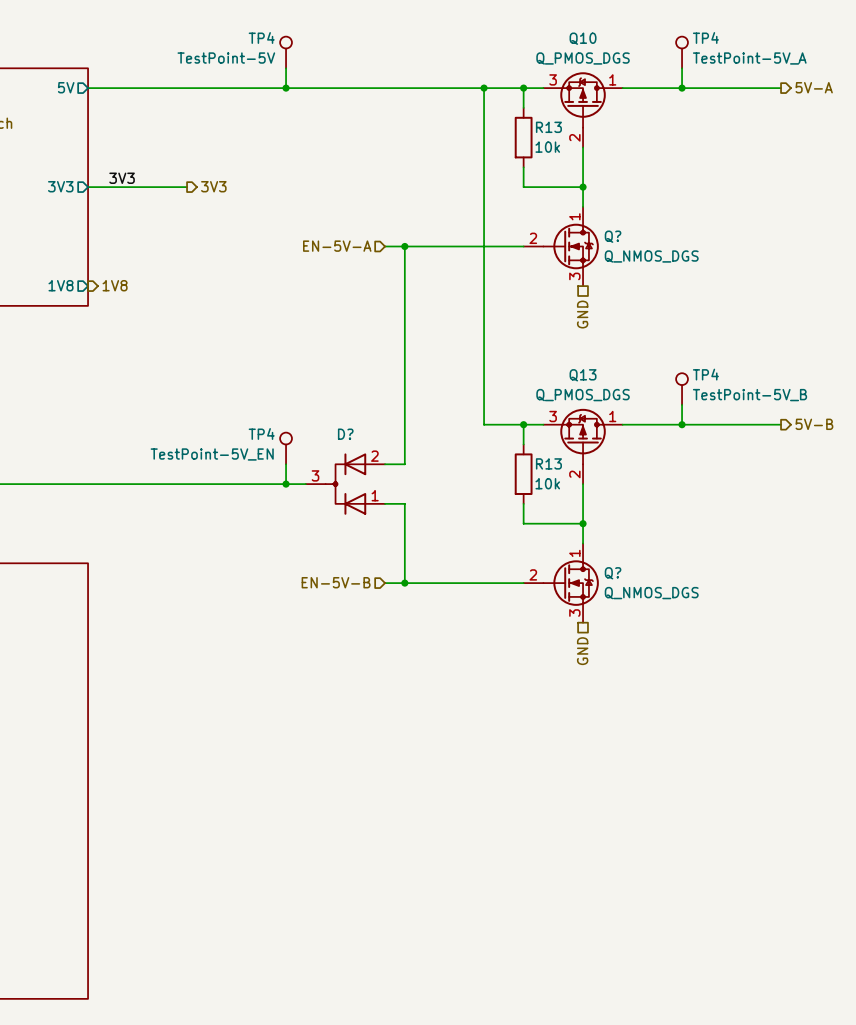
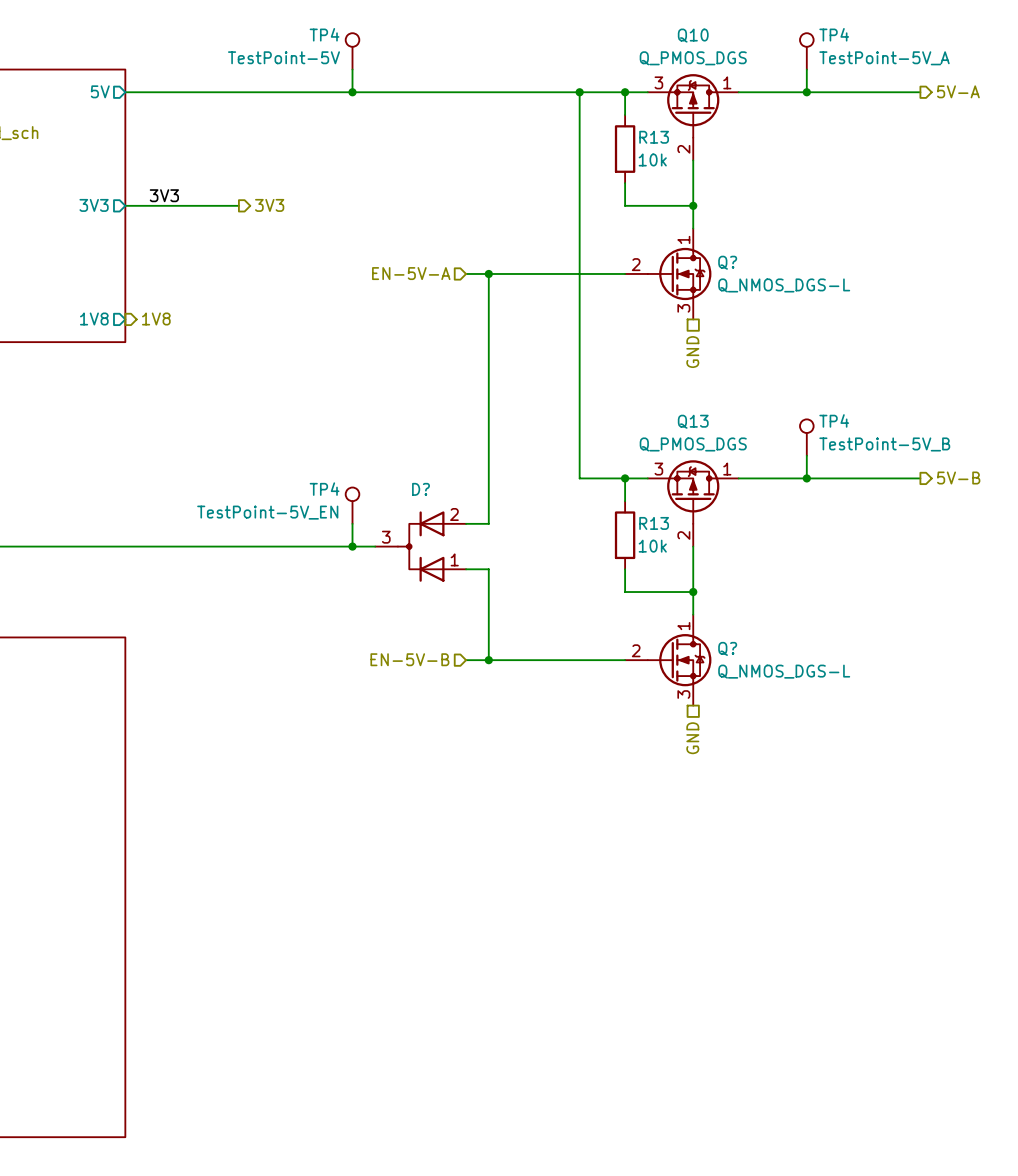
Q? value: Q_NMOS_DGS (651, 256) -> Q_NMOS_DGS-L (784, 285)
Q? value: Q_NMOS_DGS (651, 593) -> Q_NMOS_DGS-L (784, 671)

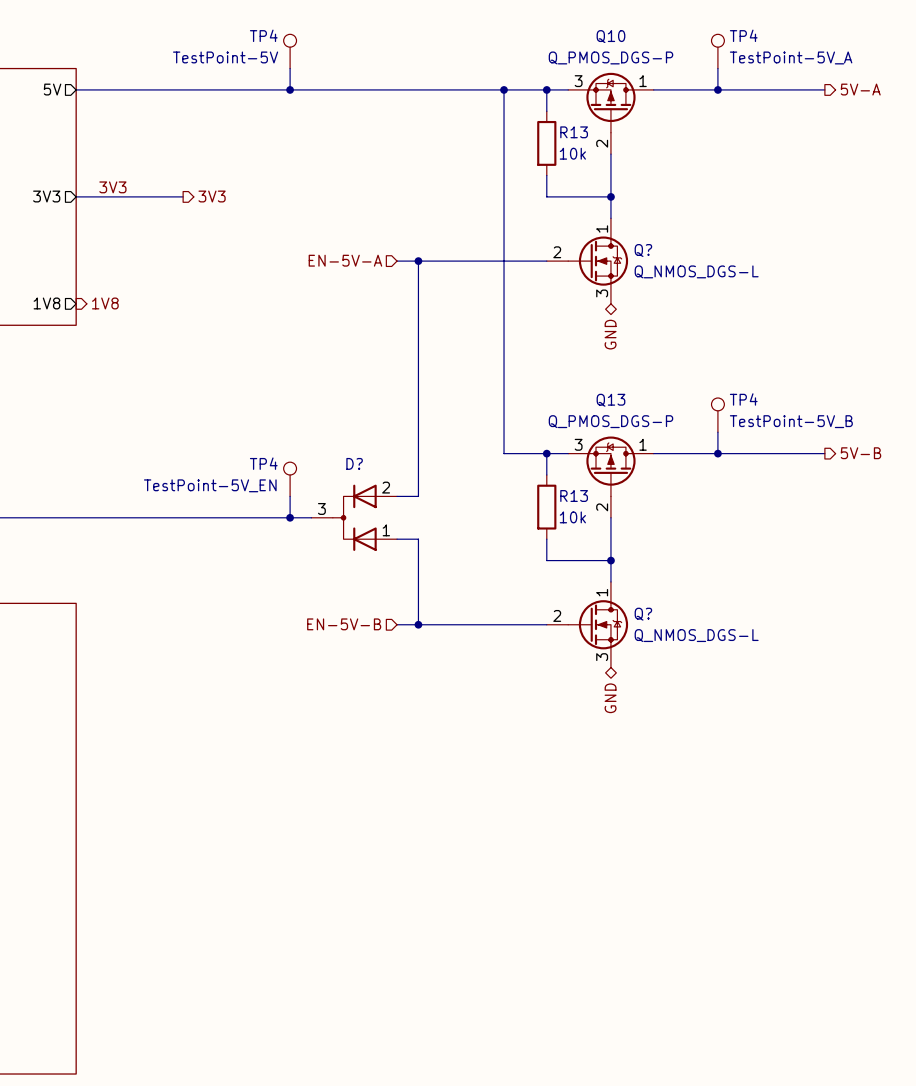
Q10 value: Q_PMOS_DGS (693, 58) -> Q_PMOS_DGS-P (610, 57)
hierarchical label shape: passive (692, 352) -> bidirectional (610, 334)
Q13 value: Q_PMOS_DGS (693, 444) -> Q_PMOS_DGS-P (610, 421)
hierarchical label shape: passive (692, 738) -> bidirectional (610, 698)

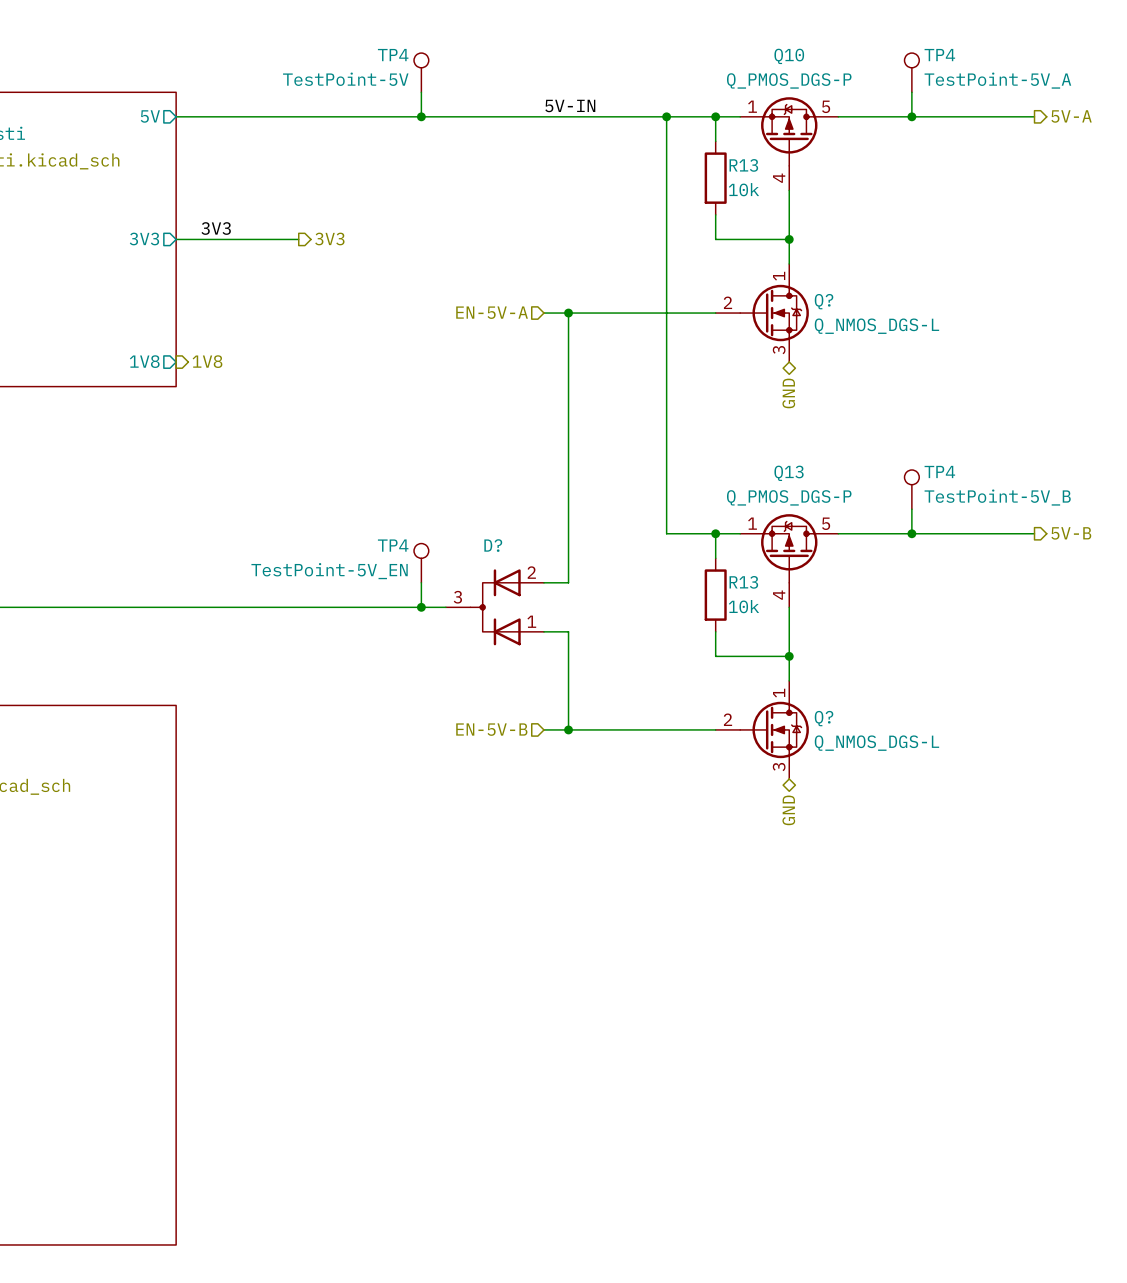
label: none -> 5V-IN (570, 105)
Q10 pin number: 3 (578, 81) -> 1 (752, 106)
Q10 pin number: 1 (643, 81) -> 5 (826, 106)
Q10 pin number: 2 (602, 143) -> 4 (779, 178)
Q13 pin number: 3 (578, 444) -> 1 (752, 523)
Q13 pin number: 1 (643, 444) -> 5 (826, 523)
Q13 pin number: 2 (602, 507) -> 4 (779, 595)

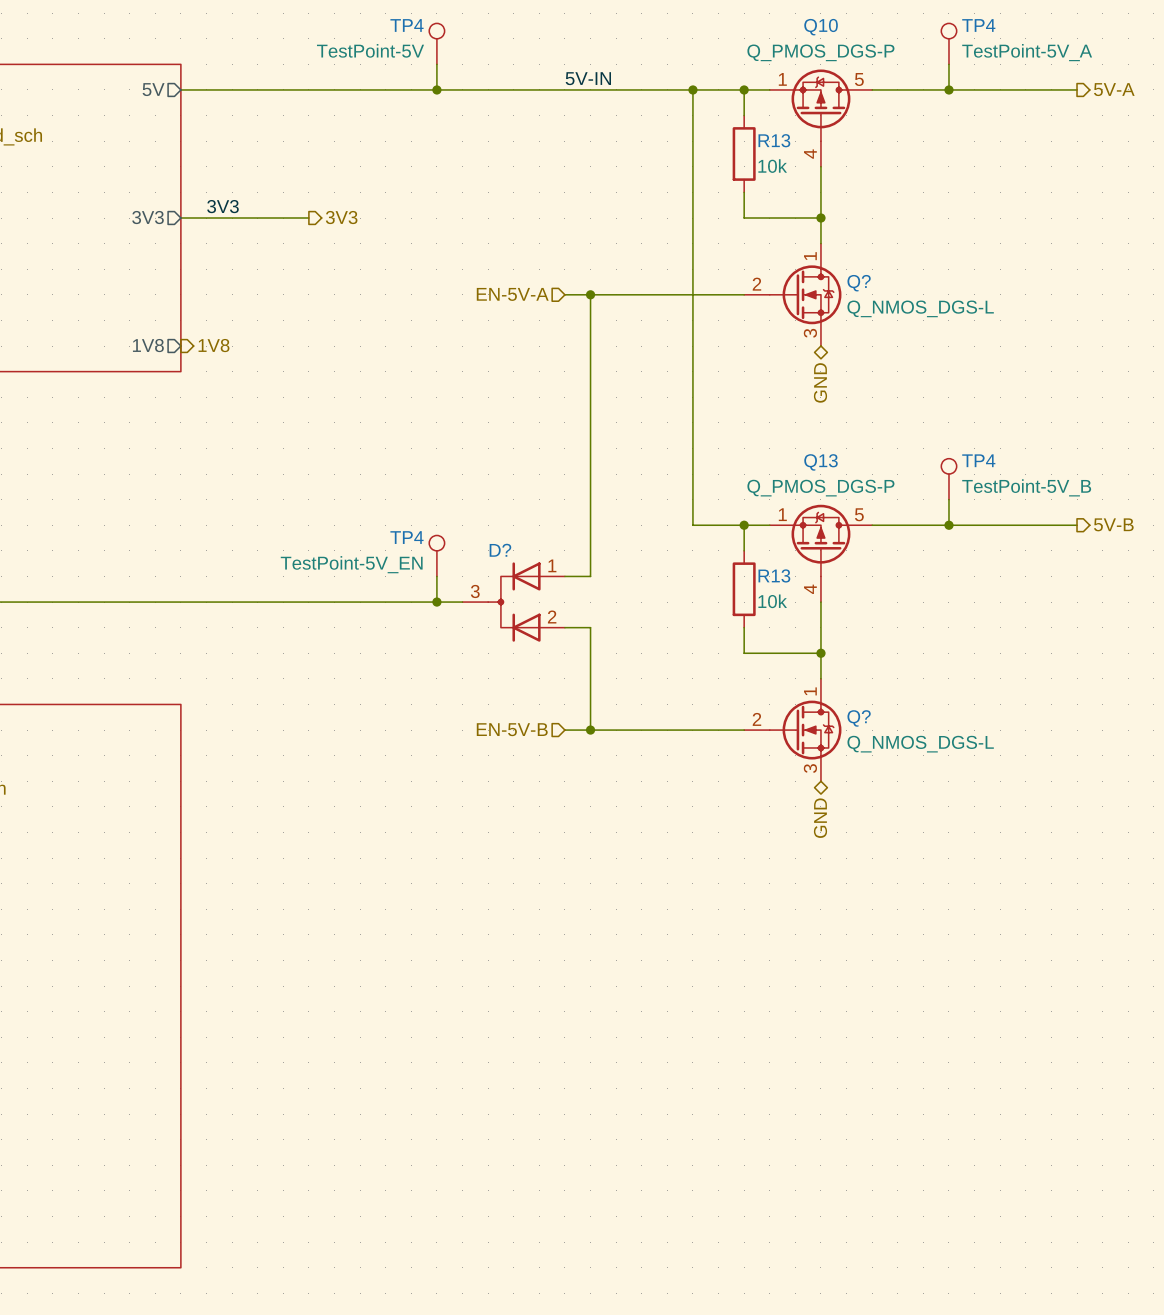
D? flip: as is (495, 607) -> up-down (514, 602)

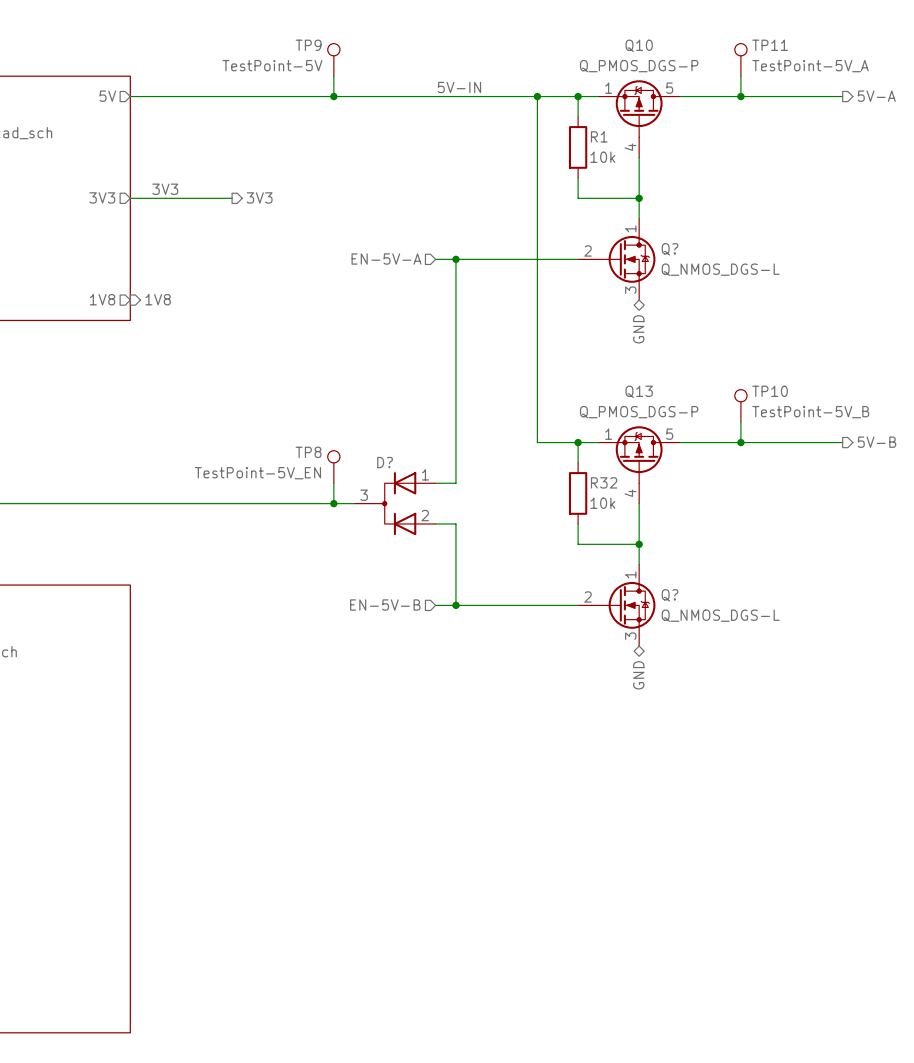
TP4 name: TP4 (406, 25) -> TP9 (308, 45)
TP4 name: TP4 (978, 25) -> TP11 (770, 45)
R13 name: R13 (774, 140) -> R1 (599, 136)
TP4 name: TP4 (978, 460) -> TP10 (770, 391)
TP4 name: TP4 (406, 537) -> TP8 (308, 452)
R13 name: R13 (774, 575) -> R32 (604, 482)

